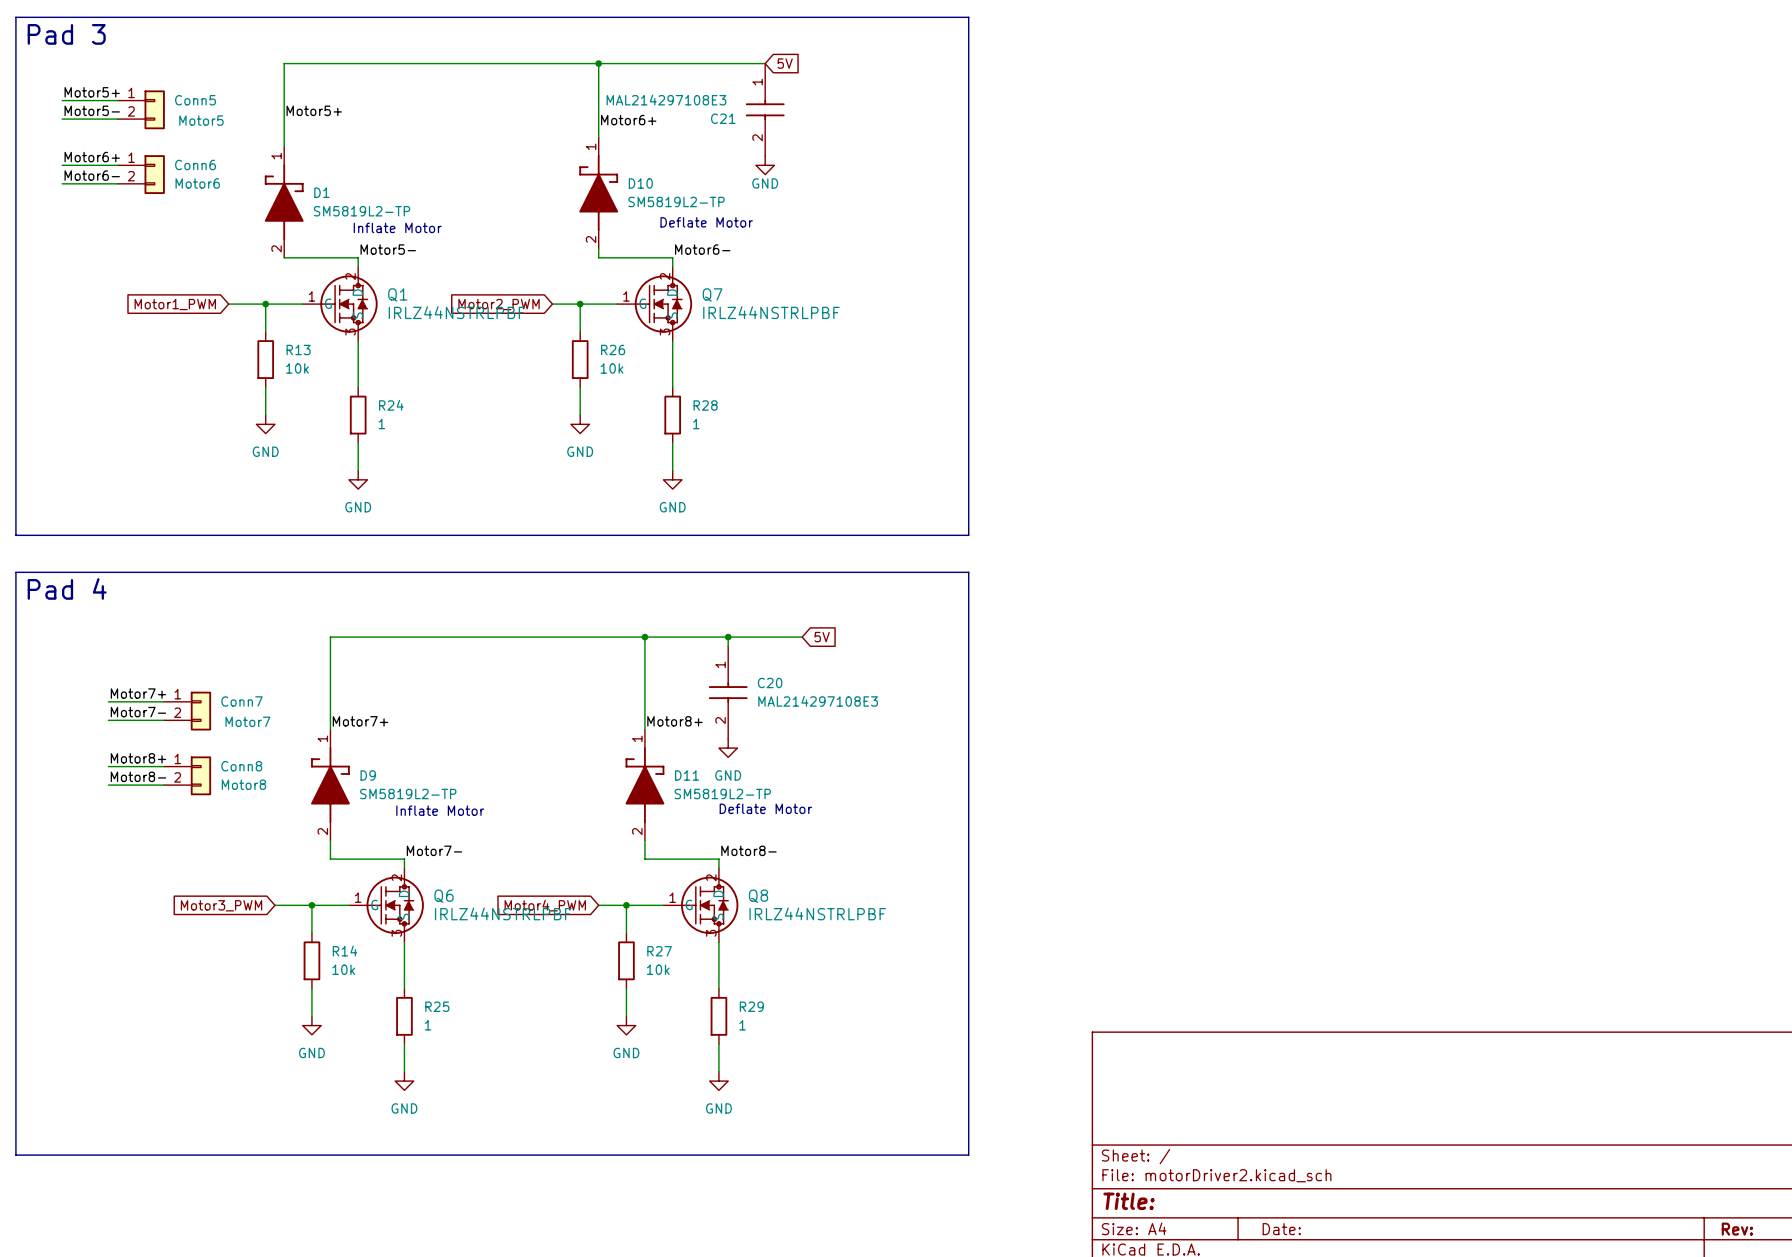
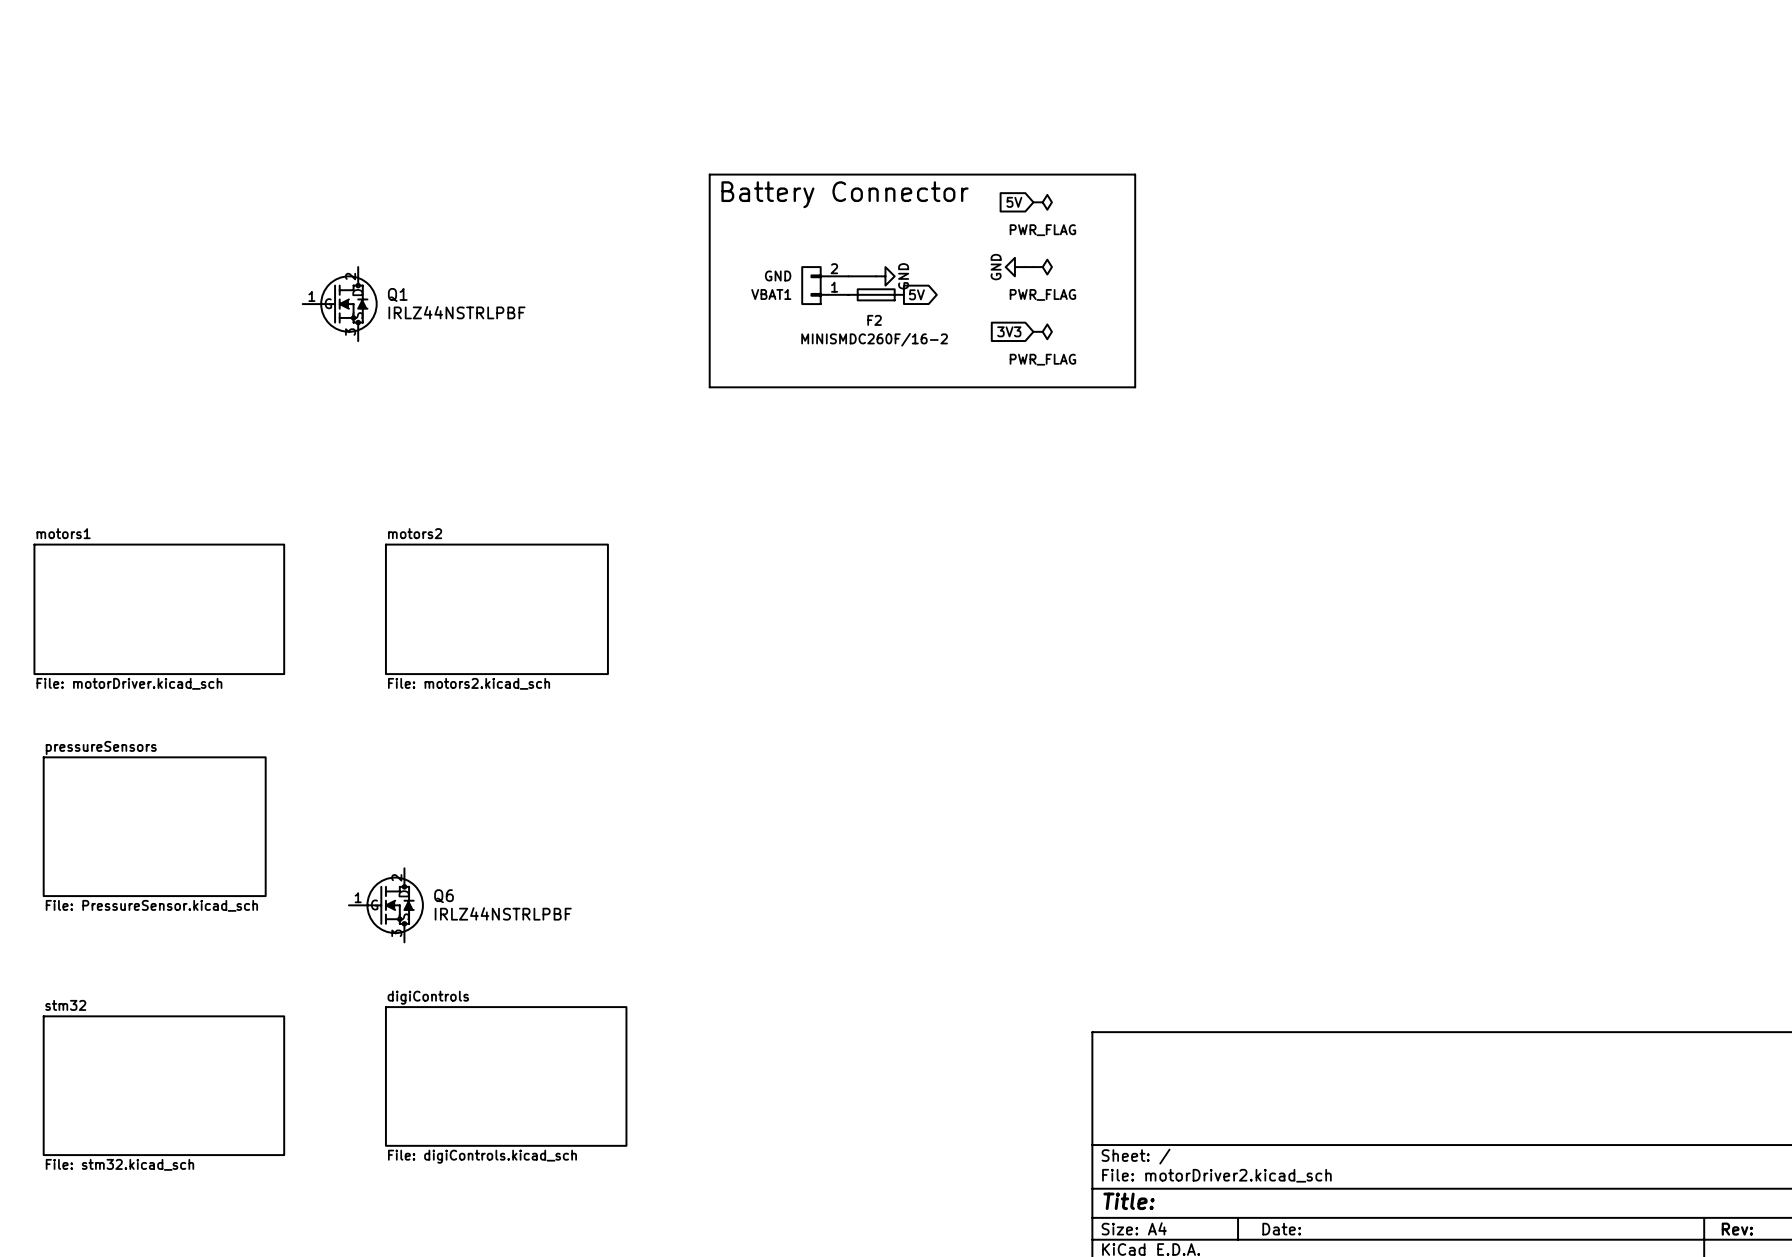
line: (15, 17) (15, 535) (968, 535) (968, 17) (15, 17) -> none
text: Pad 3 (66, 34) -> none
wire: (598, 63) (598, 137) -> none
junction: (598, 63) -> none
wire: (765, 63) (284, 63) (284, 146) -> none
global label: 5V (785, 63) -> none
label: Motor5+ (92, 92) -> none
wire: (62, 100) (117, 100) -> none
Conn5: Motor5 (141, 109) -> none
C21: MAL214297108E3 (765, 109) -> none
label: Motor5- (92, 110) -> none
label: Motor5+ (314, 110) -> none
wire: (62, 119) (117, 119) -> none
label: Motor6+ (628, 120) -> none
label: Motor6+ (92, 157) -> none
wire: (62, 165) (117, 165) -> none
power symbol: GND (765, 165) -> none
Conn6: Motor6 (141, 174) -> none
line: none -> (709, 174) (1135, 174) (1135, 387) (709, 387) (709, 174)
label: Motor6- (92, 175) -> none
wire: (62, 183) (117, 183) -> none
D10: SM5819L2-TP (598, 193) -> none
text: none -> Battery Connector (845, 194)
D1: SM5819L2-TP (284, 202) -> none
global label: none -> 5V (1014, 202)
power symbol: none -> PWR_FLAG (1042, 202)
text: Deflate Motor (706, 222) -> none
text: Inflate Motor (397, 227) -> none
wire: (598, 248) (598, 257) (672, 257) (672, 267) -> none
label: Motor5- (388, 249) -> none
label: Motor6- (702, 249) -> none
wire: (284, 257) (358, 257) (358, 267) -> none
power symbol: none -> GND (1014, 267)
wire: none -> (1024, 267) (1033, 267)
power symbol: none -> PWR_FLAG (1042, 267)
wire: none -> (848, 276) (876, 276)
power symbol: none -> GND (885, 276)
VBAT1: none -> GND (824, 285)
F2: none -> MINISMDC260F/16-2 (876, 294)
global label: none -> 5V (916, 294)
global label: Motor1_PWM (175, 304) -> none
wire: (228, 304) (302, 304) -> none
wire: (265, 304) (265, 331) -> none
junction: (265, 304) -> none
global label: Motor2_PWM (499, 304) -> none
wire: (552, 304) (617, 304) -> none
wire: (580, 304) (580, 331) -> none
junction: (580, 304) -> none
Q7: IRLZ44NSTRLPBF (654, 304) -> none
global label: none -> 3V3 (1009, 331)
power symbol: none -> PWR_FLAG (1042, 331)
wire: (358, 341) (358, 387) -> none
wire: (672, 341) (672, 387) -> none
R13: 10k (265, 359) -> none
R26: 10k (580, 359) -> none
wire: (265, 387) (265, 415) -> none
wire: (580, 387) (580, 415) -> none
R24: 1 (358, 415) -> none
R28: 1 (672, 415) -> none
power symbol: GND (265, 424) -> none
power symbol: GND (580, 424) -> none
wire: (358, 442) (358, 470) -> none
wire: (672, 442) (672, 470) -> none
power symbol: GND (358, 479) -> none
power symbol: GND (672, 479) -> none
line: (15, 572) (968, 572) (968, 1155) (15, 1155) (15, 572) -> none
text: Pad 4 (67, 588) -> none
sheet motors1: none -> File: motorDriver.kicad_sch (159, 609)
sheet motors2: none -> File: motors2.kicad_sch (496, 609)
wire: (644, 637) (644, 729) -> none
junction: (644, 637) -> none
wire: (728, 637) (728, 646) -> none
junction: (728, 637) -> none
wire: (802, 637) (330, 637) (330, 729) -> none
global label: 5V (822, 637) -> none
C20: MAL214297108E3 (728, 692) -> none
label: Motor7+ (138, 693) -> none
wire: (108, 701) (163, 701) -> none
Conn7: Motor7 (187, 711) -> none
label: Motor7- (138, 712) -> none
wire: (108, 720) (163, 720) -> none
label: Motor7+ (360, 721) -> none
label: Motor8+ (674, 721) -> none
power symbol: GND (728, 748) -> none
label: Motor8+ (138, 758) -> none
wire: (108, 766) (163, 766) -> none
Conn8: Motor8 (187, 775) -> none
label: Motor8- (138, 776) -> none
wire: (108, 785) (163, 785) -> none
D9: SM5819L2-TP (330, 785) -> none
D11: SM5819L2-TP (644, 785) -> none
text: Deflate Motor (765, 808) -> none
text: Inflate Motor (440, 810) -> none
sheet pressureSensors: none -> File: PressureSensor.kicad_sch (154, 826)
wire: (330, 840) (330, 859) (404, 859) (404, 868) -> none
wire: (644, 840) (644, 859) (718, 859) (718, 868) -> none
label: Motor7- (434, 850) -> none
label: Motor8- (748, 850) -> none
global label: Motor3_PWM (221, 905) -> none
wire: (274, 905) (348, 905) -> none
wire: (311, 905) (311, 933) -> none
junction: (311, 905) -> none
global label: Motor4_PWM (545, 905) -> none
wire: (598, 905) (663, 905) -> none
wire: (626, 905) (626, 933) -> none
junction: (626, 905) -> none
Q8: IRLZ44NSTRLPBF (700, 905) -> none
wire: (404, 942) (404, 988) -> none
wire: (718, 942) (718, 988) -> none
R14: 10k (311, 960) -> none
R27: 10k (626, 960) -> none
wire: (311, 988) (311, 1016) -> none
wire: (626, 988) (626, 1016) -> none
R25: 1 (404, 1016) -> none
R29: 1 (718, 1016) -> none
power symbol: GND (311, 1025) -> none
power symbol: GND (626, 1025) -> none
wire: (404, 1044) (404, 1071) -> none
wire: (718, 1044) (718, 1071) -> none
sheet digiControls: none -> File: digiControls.kicad_sch (506, 1076)
power symbol: GND (404, 1081) -> none
power symbol: GND (718, 1081) -> none
sheet stm32: none -> File: stm32.kicad_sch (163, 1085)

